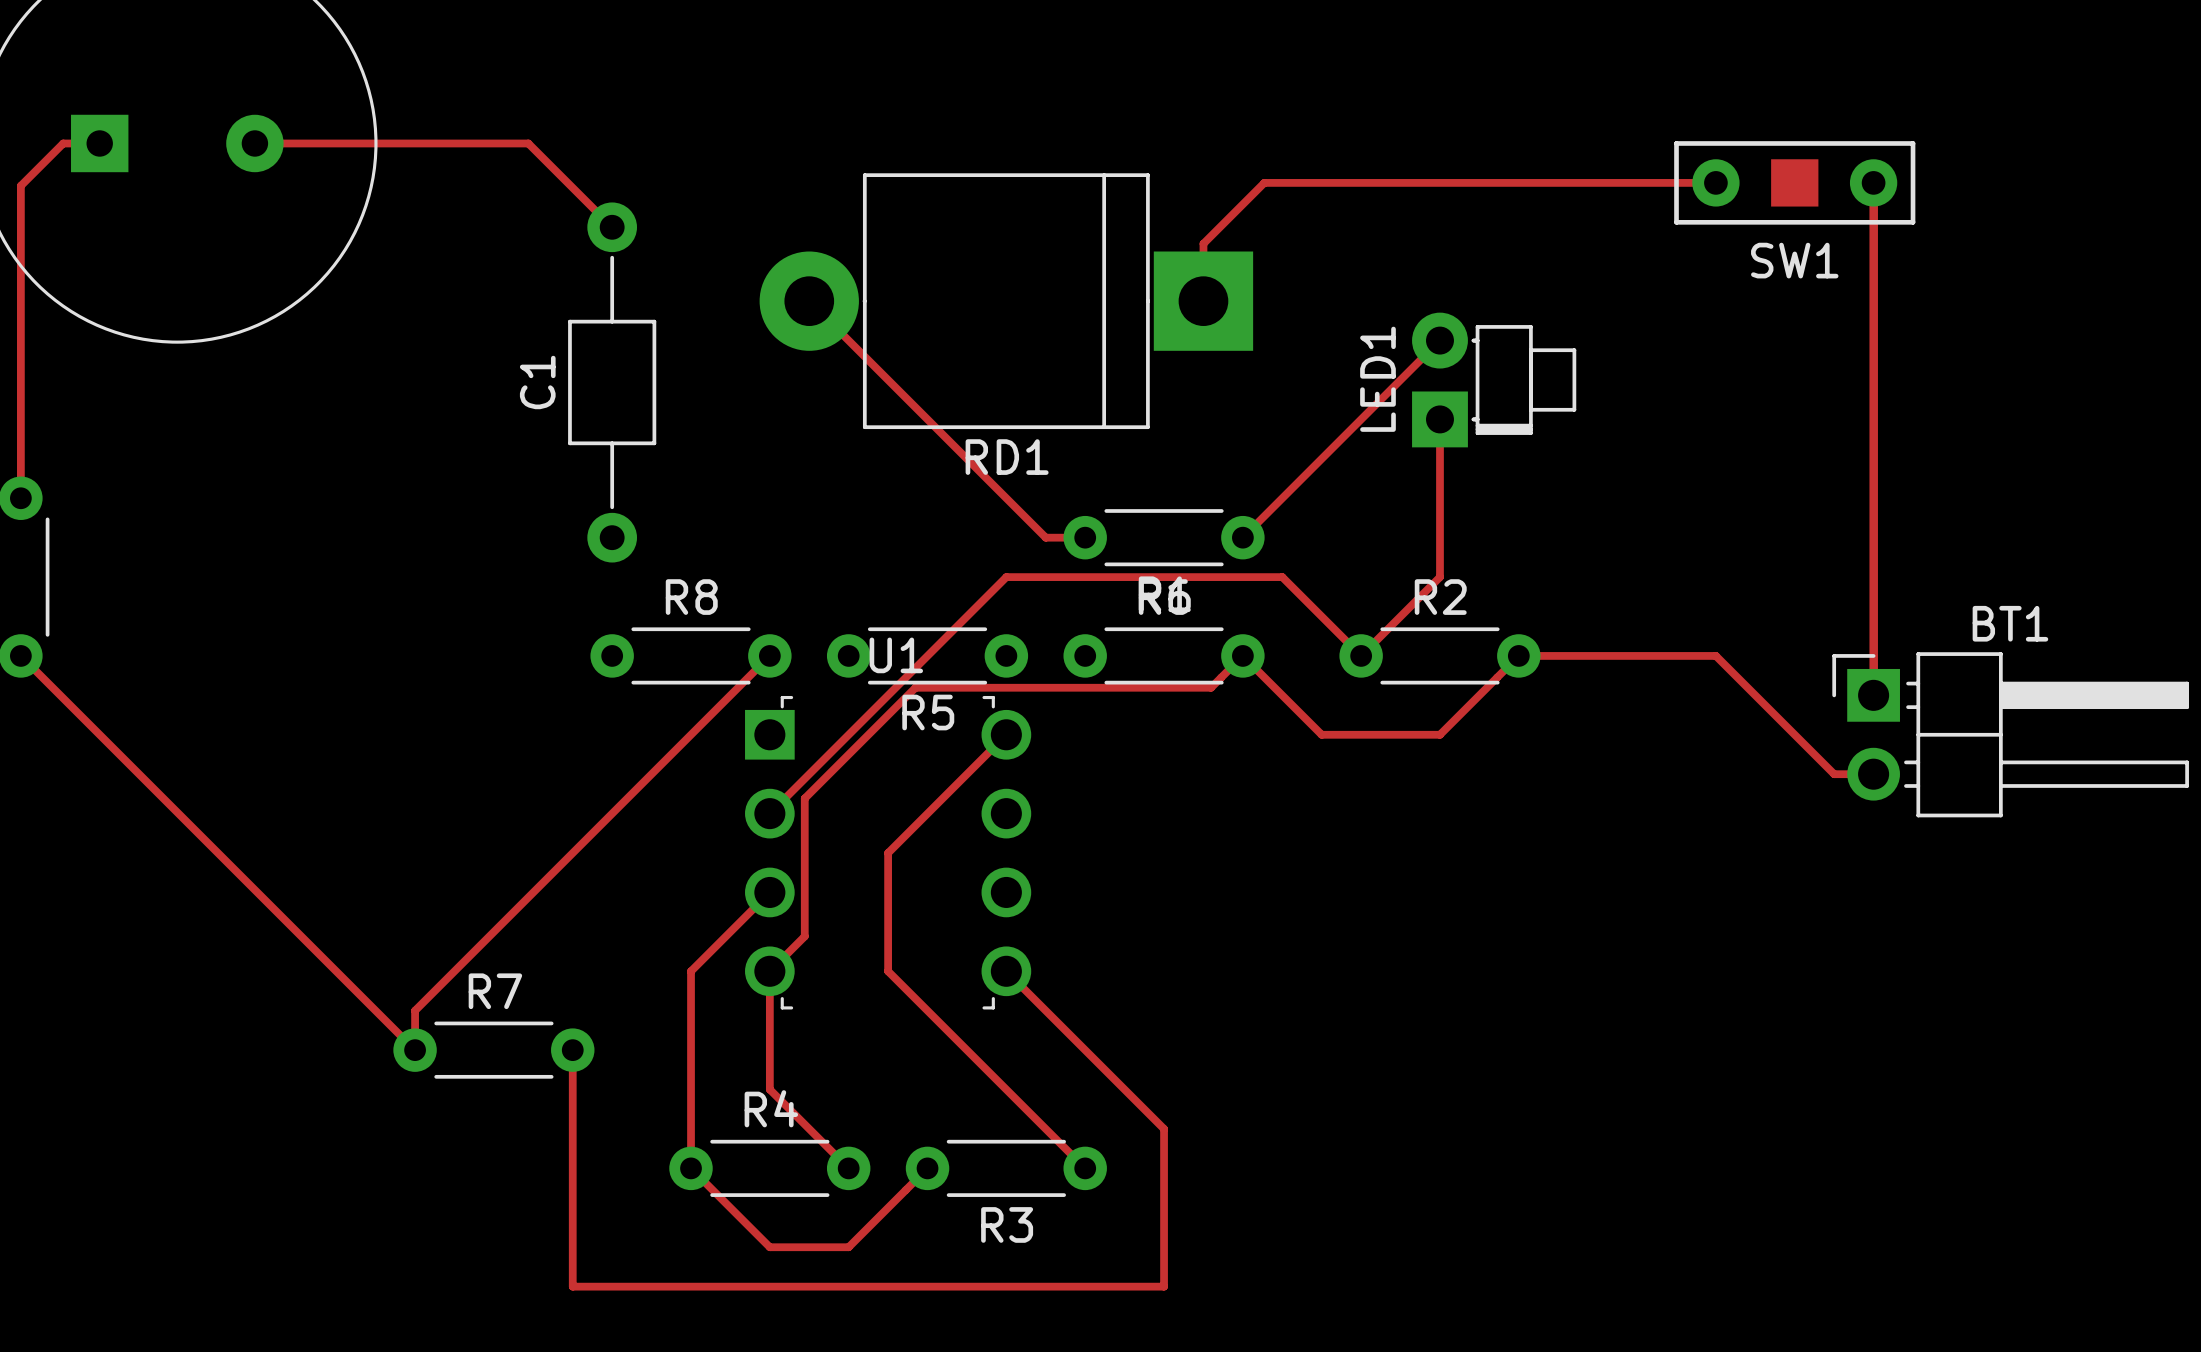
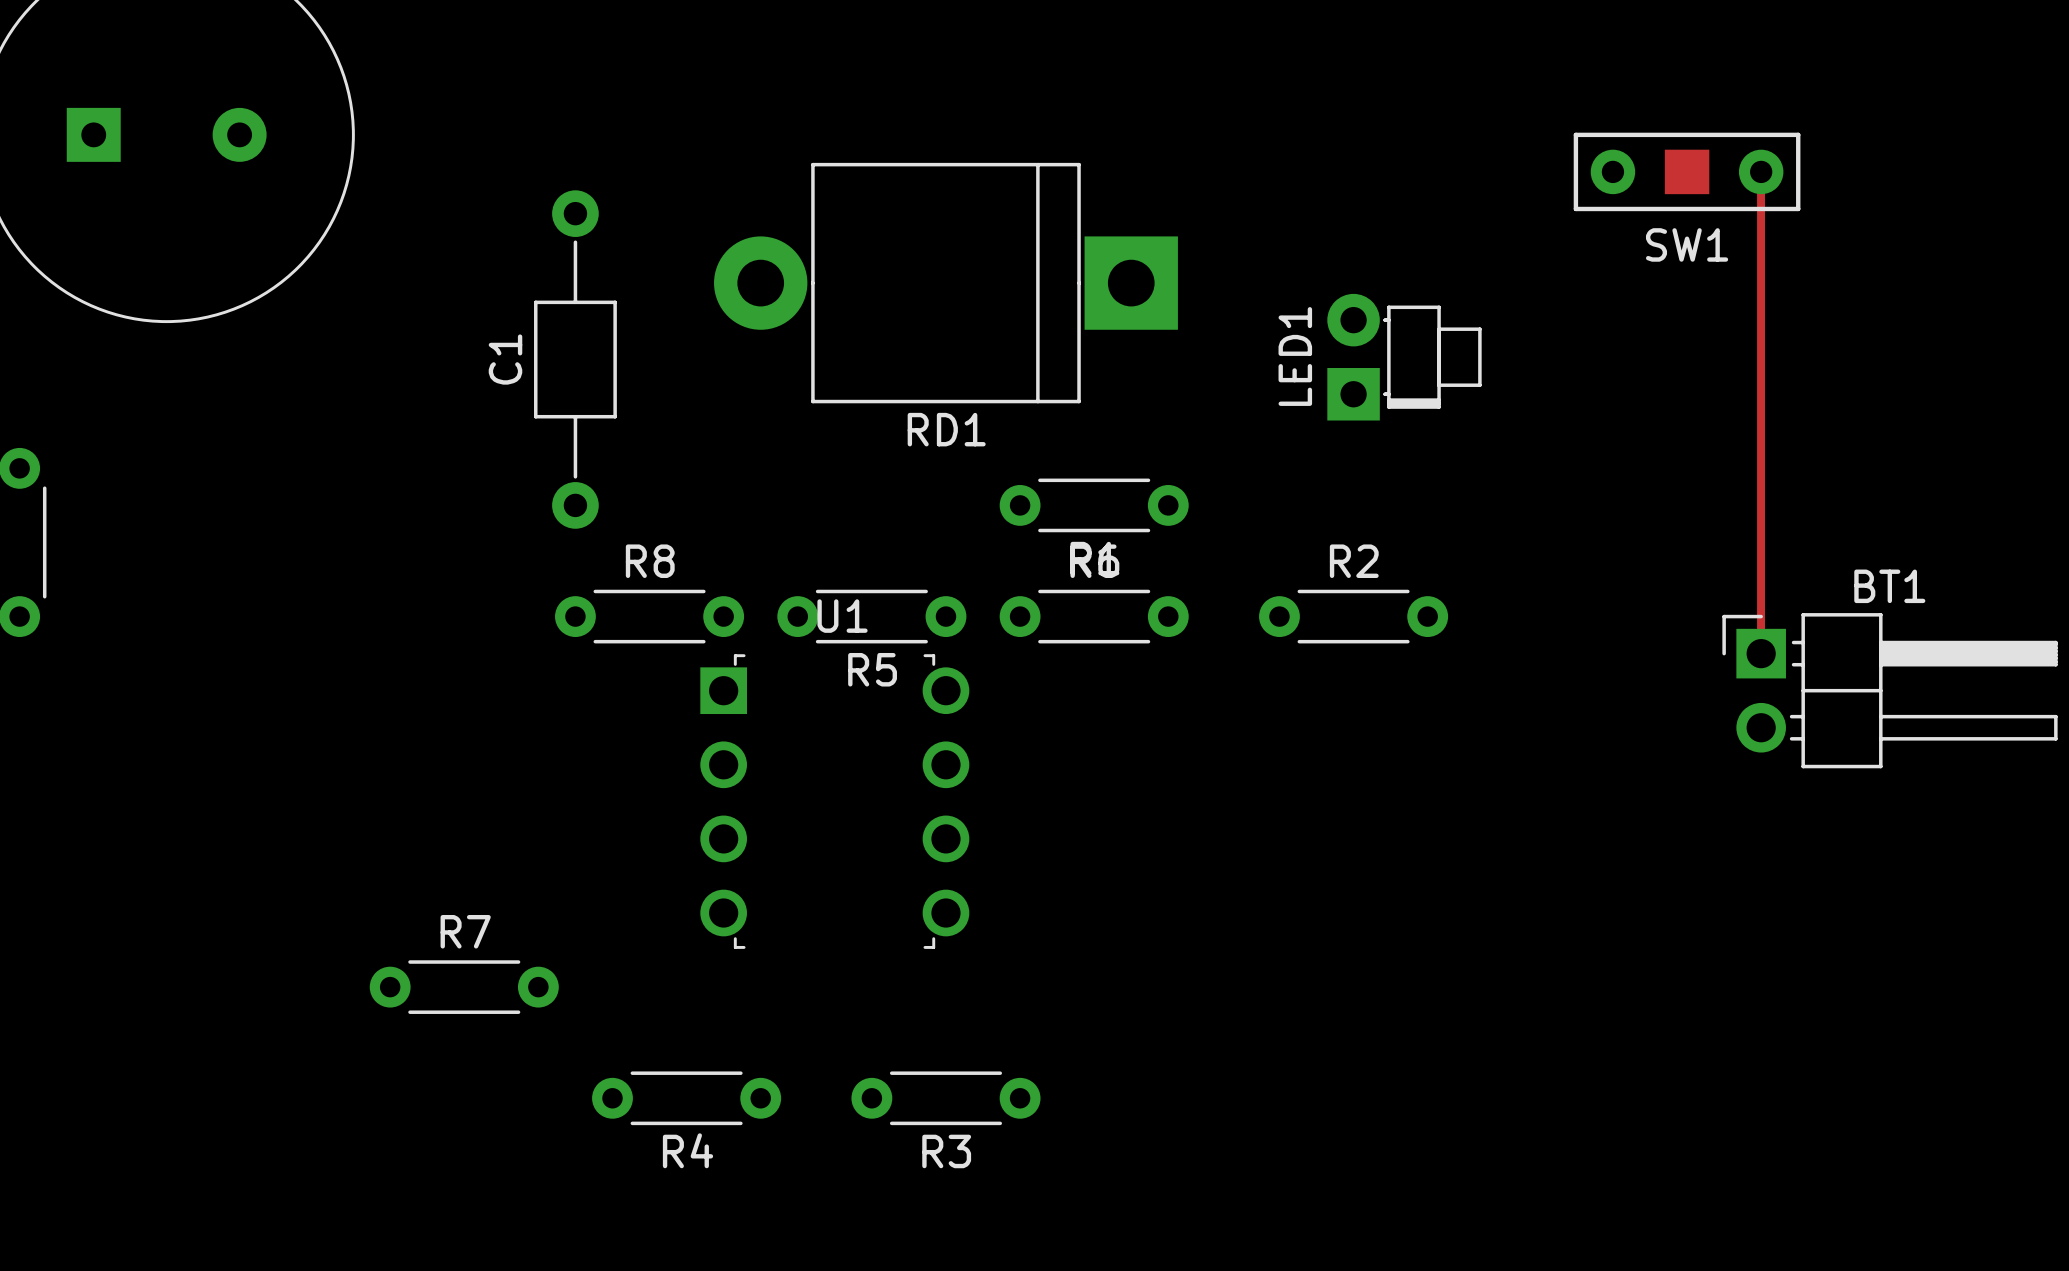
track: (99, 143) (63, 143) (20, 185) (20, 498) -> none
track: (254, 143) (528, 143) (612, 227) -> none
track: (1715, 182) (1264, 182) (1203, 243) (1203, 301) -> none
track: (809, 301) (1045, 537) (1085, 537) -> none
track: (1439, 340) (1242, 537) -> none
track: (1439, 419) (1439, 577) (1361, 655) (1282, 577) (1006, 577) (769, 813) -> none
track: (20, 655) (415, 1050) (415, 1010) (769, 655) -> none
track: (1006, 734) (888, 853) (888, 971) (1085, 1168) -> none
track: (1873, 774) (1834, 774) (1715, 655) (1518, 655) (1439, 734) (1321, 734) (1242, 655) (1211, 687) (915, 687) (804, 798) (804, 936) (769, 971) (769, 1089) (848, 1168) -> none
track: (769, 892) (691, 971) (691, 1168) (769, 1247) (848, 1247) (927, 1168) -> none
track: (1006, 971) (1164, 1128) (1164, 1286) (572, 1286) (572, 1050) -> none
R4 name position: R4 (771, 1108) -> R4 (687, 1150)
R4 position: (769, 1168) -> (686, 1098)

